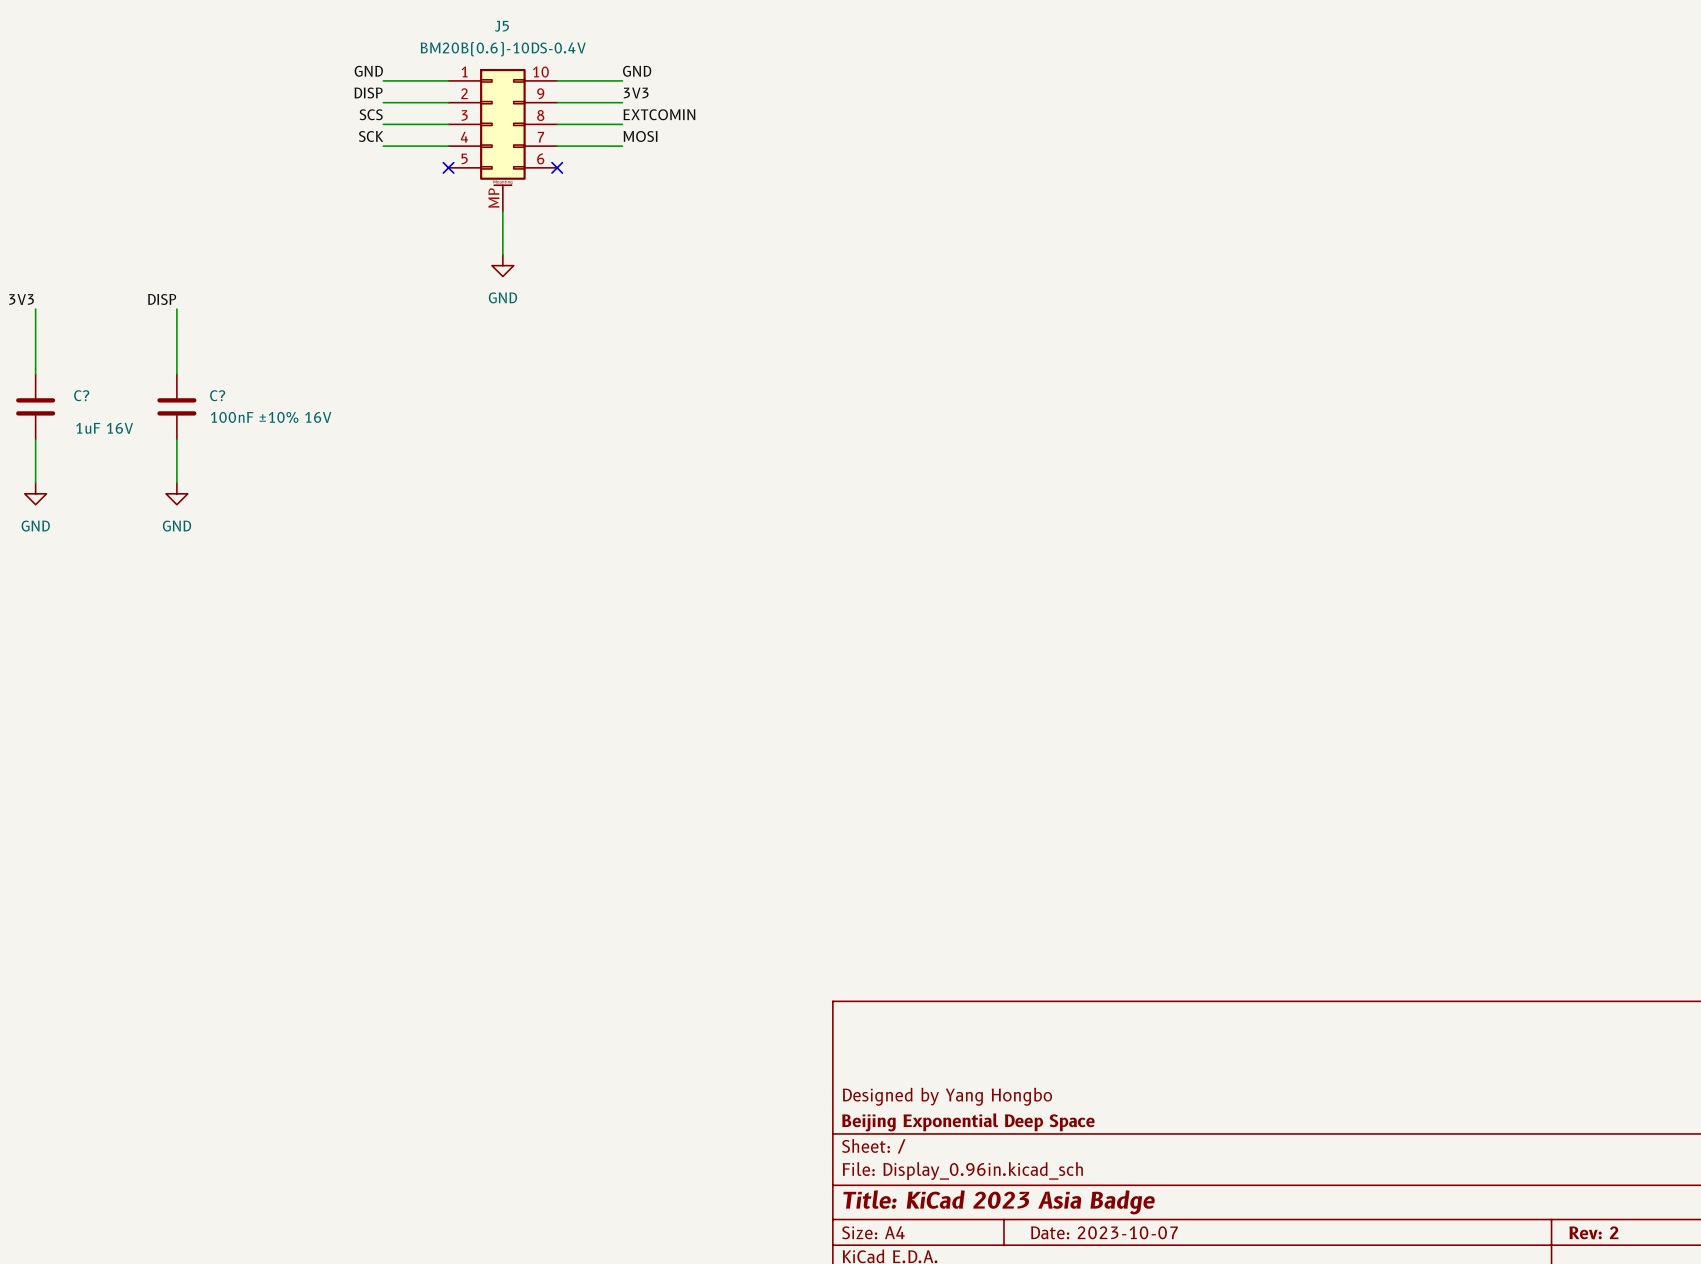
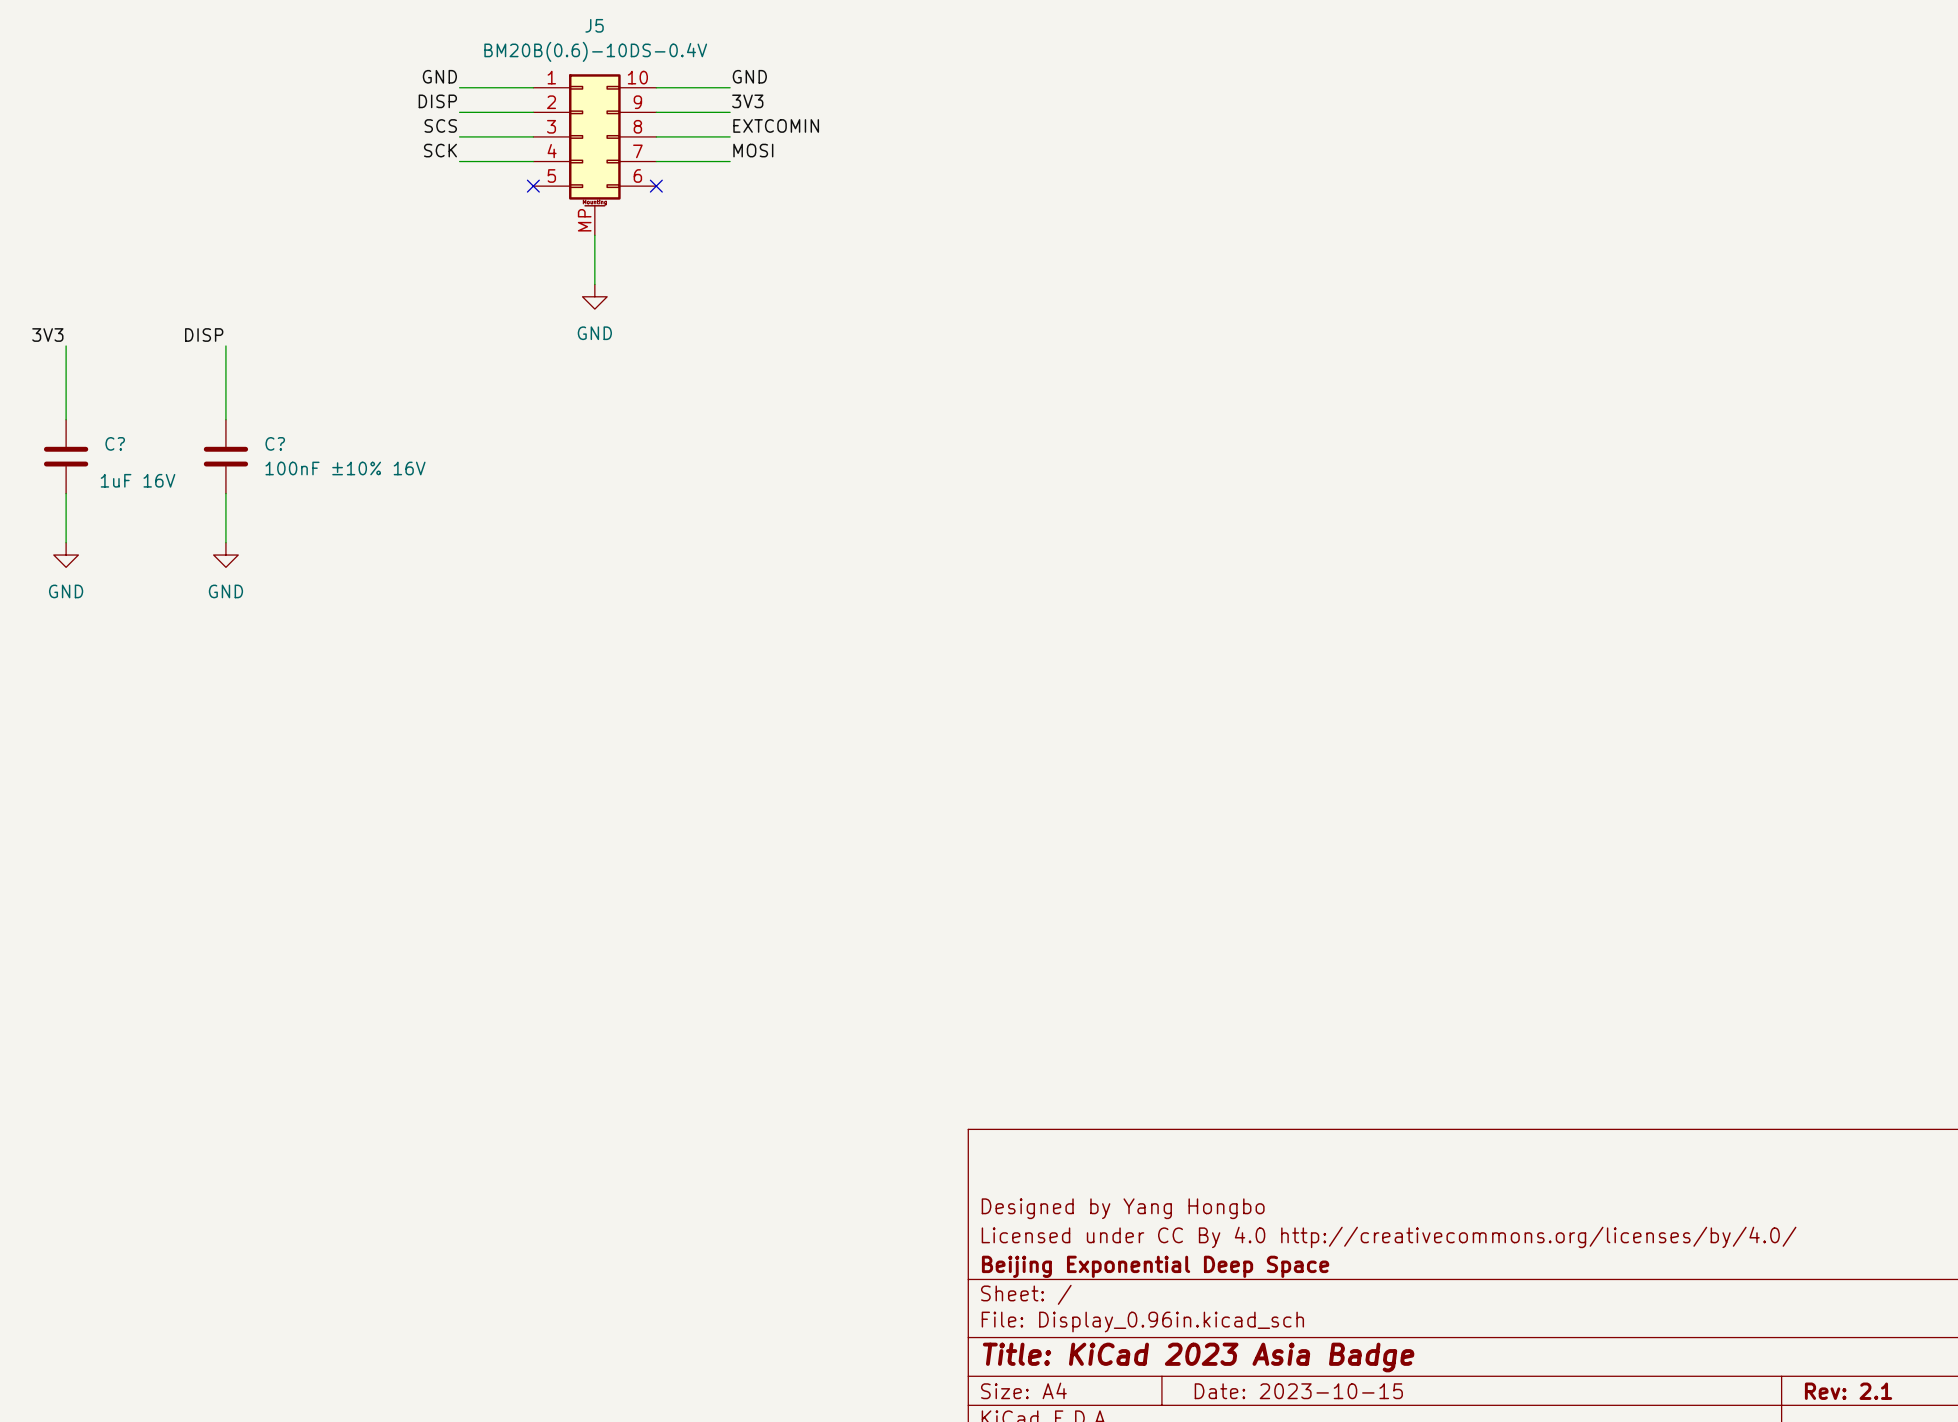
title block: none -> Designed by Yang Hongbo (1123, 1208)
title block: Designed by Yang Hongbo (947, 1096) -> Licensed under CC By 4.0 http://creativecommons.org/licenses/by/4.0/ (1389, 1237)
title block: Date: 2023-10-07 (1104, 1232) -> Date: 2023-10-15 (1298, 1391)
title block: Rev: 2 (1593, 1232) -> Rev: 2.1 (1848, 1391)

